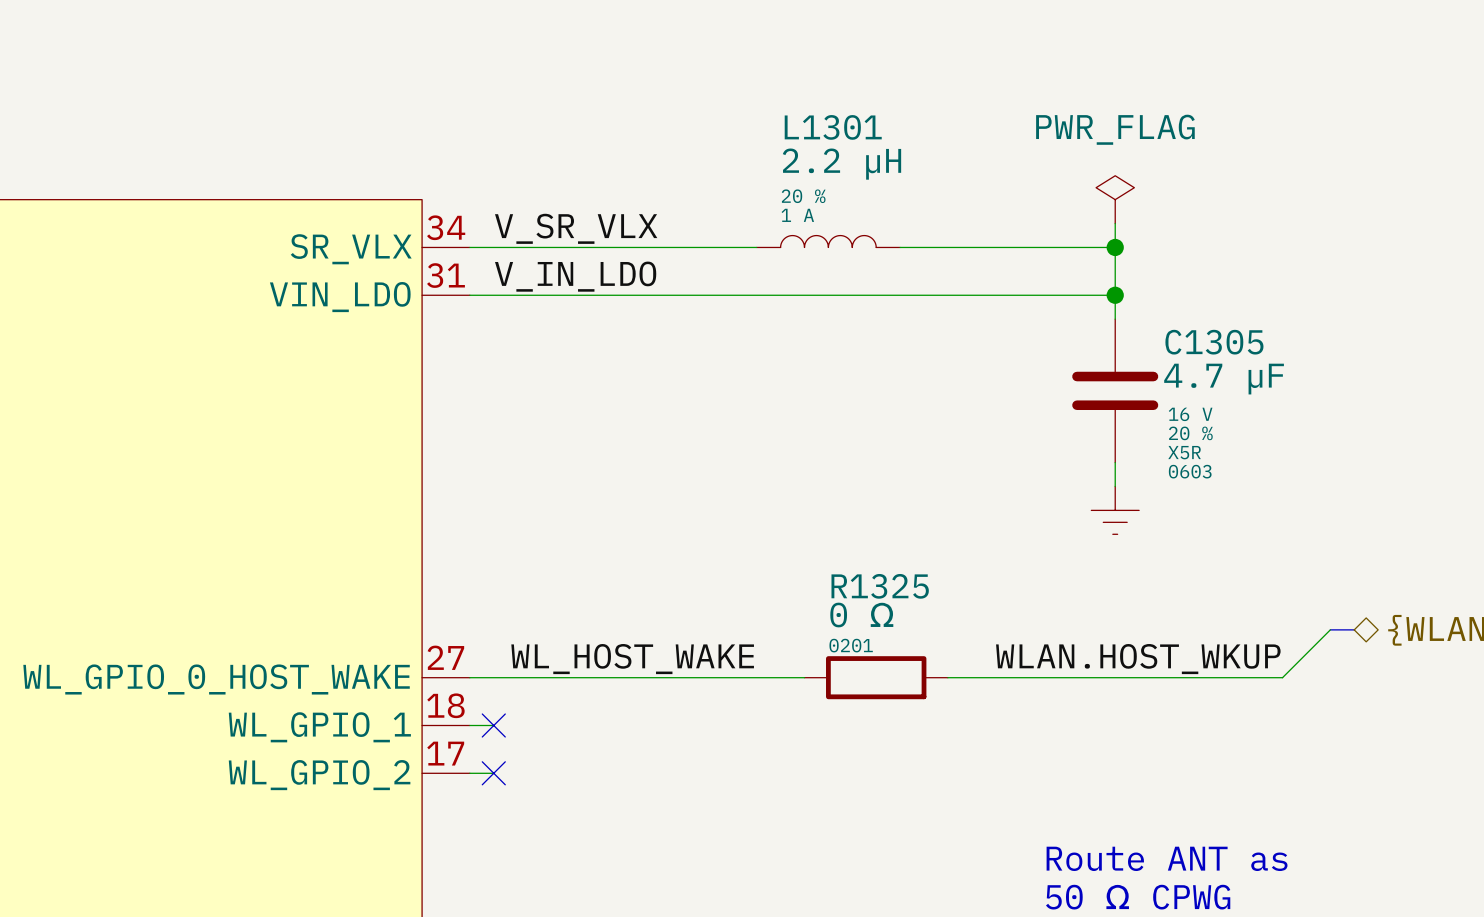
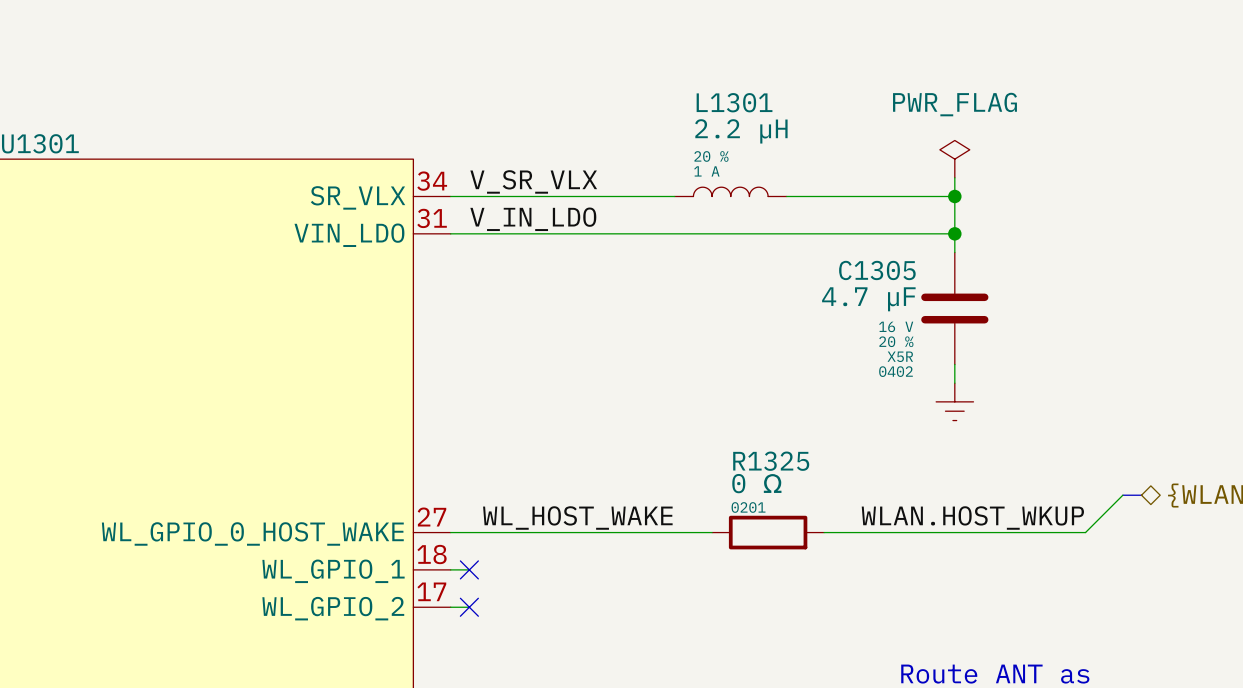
C1305 name position: C1305 (1214, 342) -> C1305 (877, 270)
C1305 value position: 4.7 µF (1224, 379) -> 4.7 µF (868, 299)
C1305 text position: 16 V (1190, 414) -> 16 V (896, 326)
C1305 text position: 20 % (1190, 433) -> 20 % (896, 341)
C1305 text position: X5R (1184, 452) -> X5R (900, 356)
C1305 text: 0603 (1190, 471) -> 0402 (896, 371)

